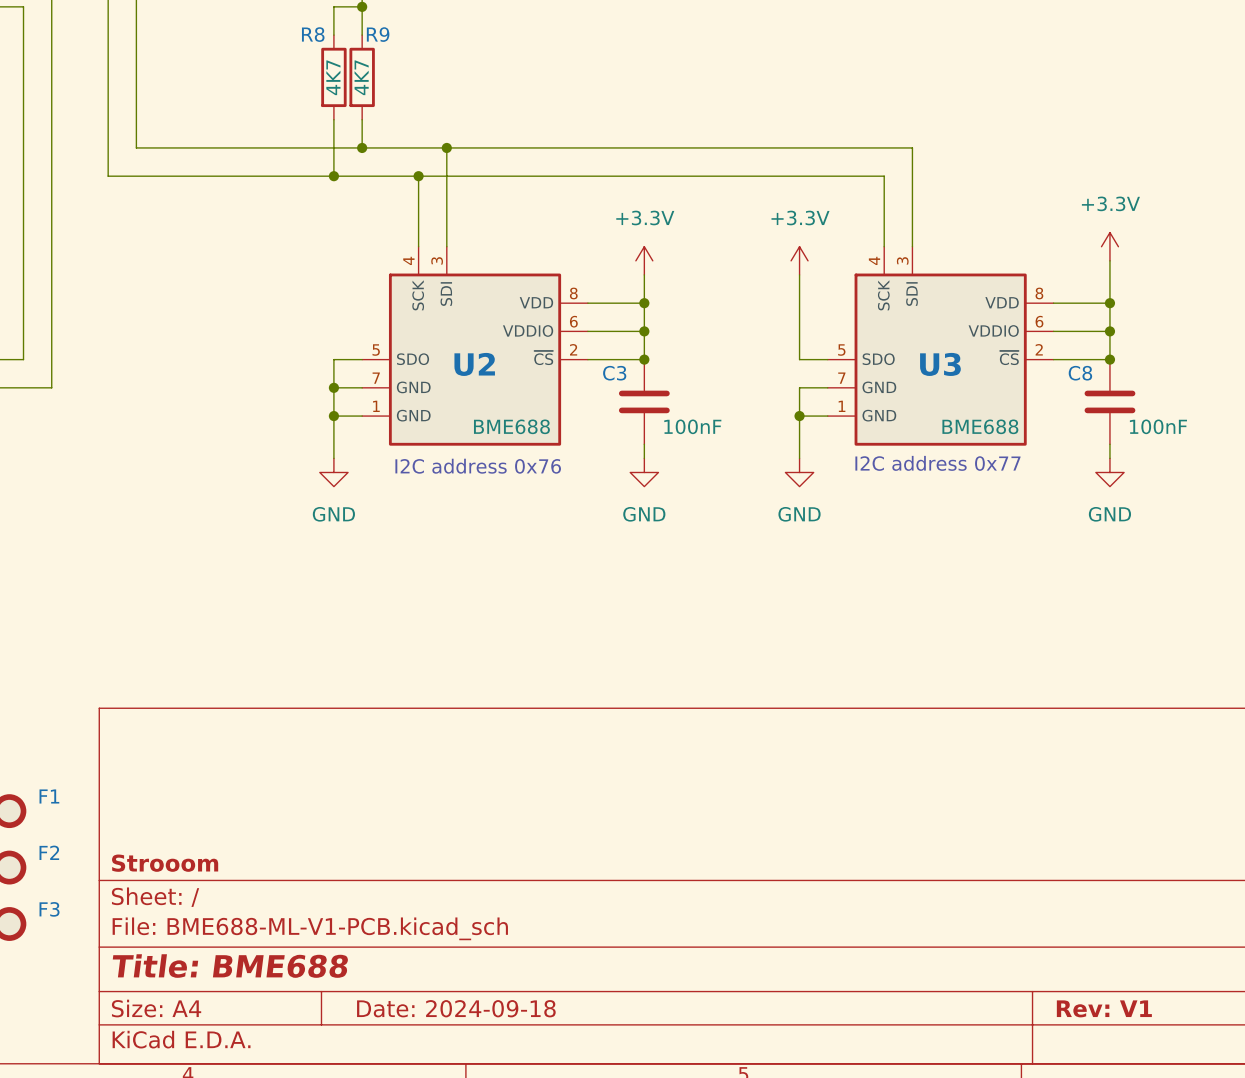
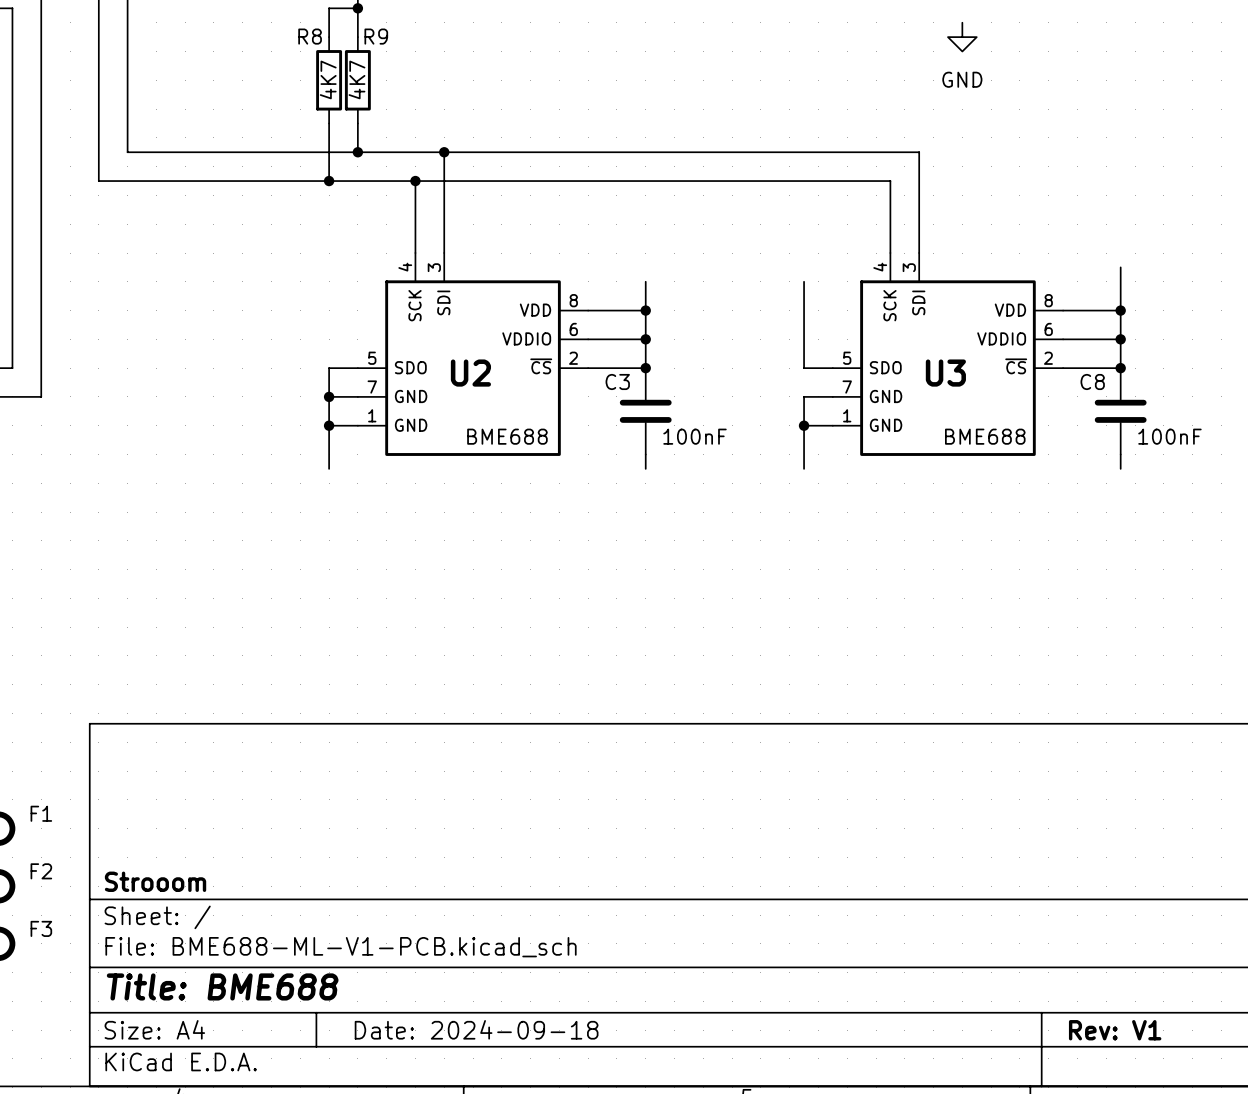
power symbol: none -> GND (962, 37)
power symbol: +3.3V (1109, 246) -> none
power symbol: +3.3V (644, 260) -> none
power symbol: +3.3V (799, 260) -> none
text: I2C address 0x77 (937, 463) -> none
text: I2C address 0x76 (478, 466) -> none
power symbol: GND (333, 472) -> none
power symbol: GND (644, 472) -> none
power symbol: GND (799, 472) -> none
power symbol: GND (1109, 472) -> none

